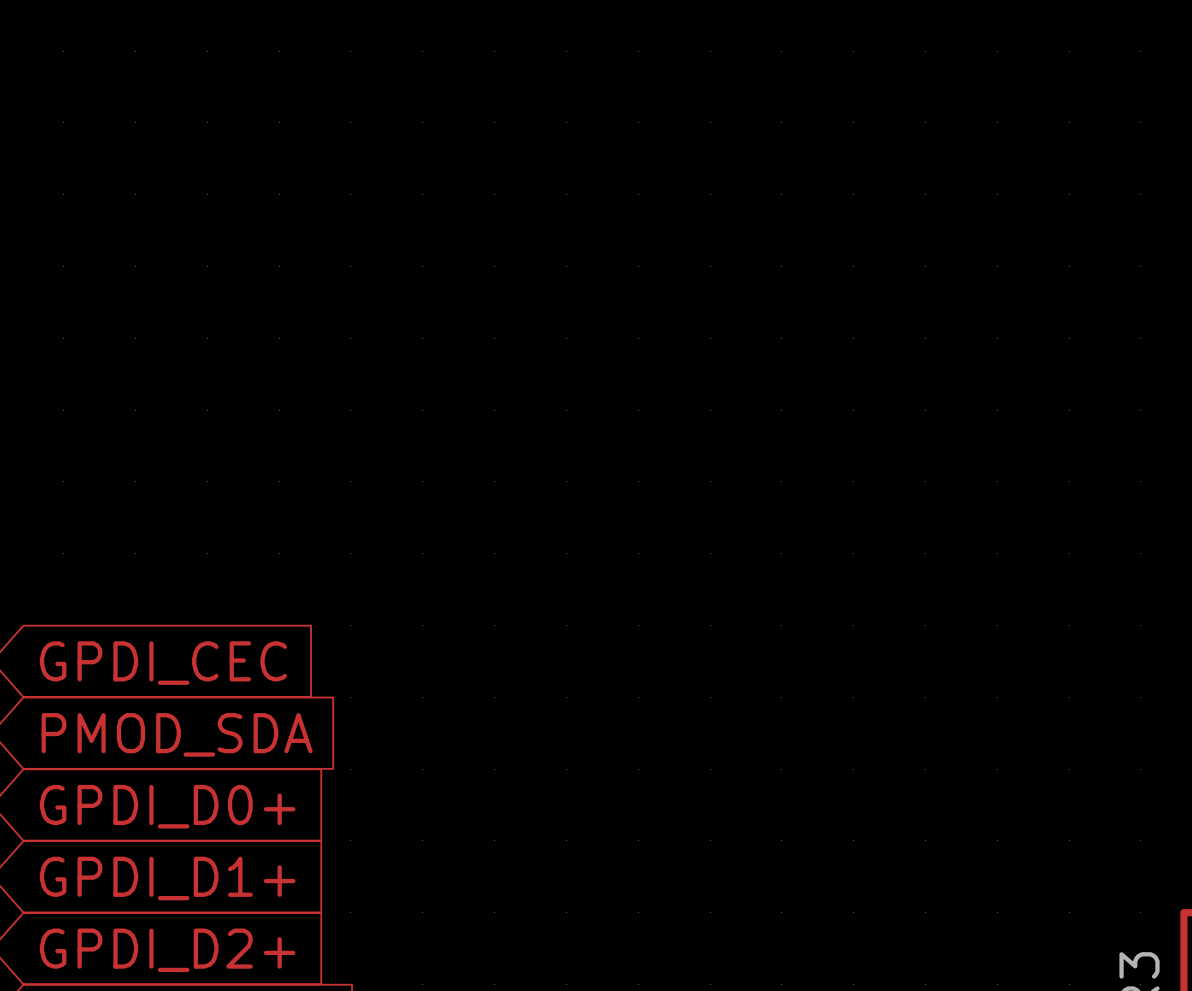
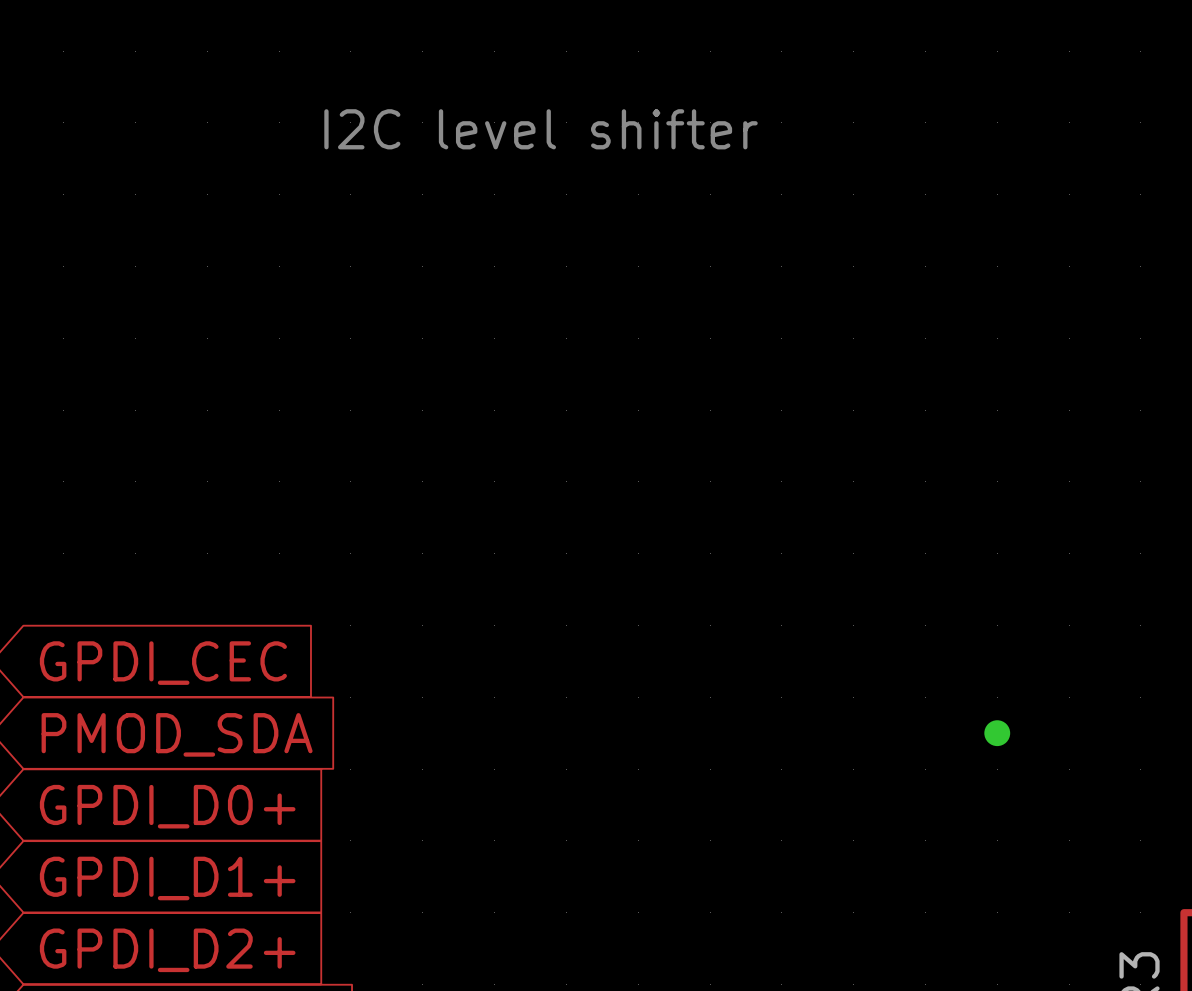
text: none -> I2C level shifter (541, 129)
junction: none -> (997, 733)

